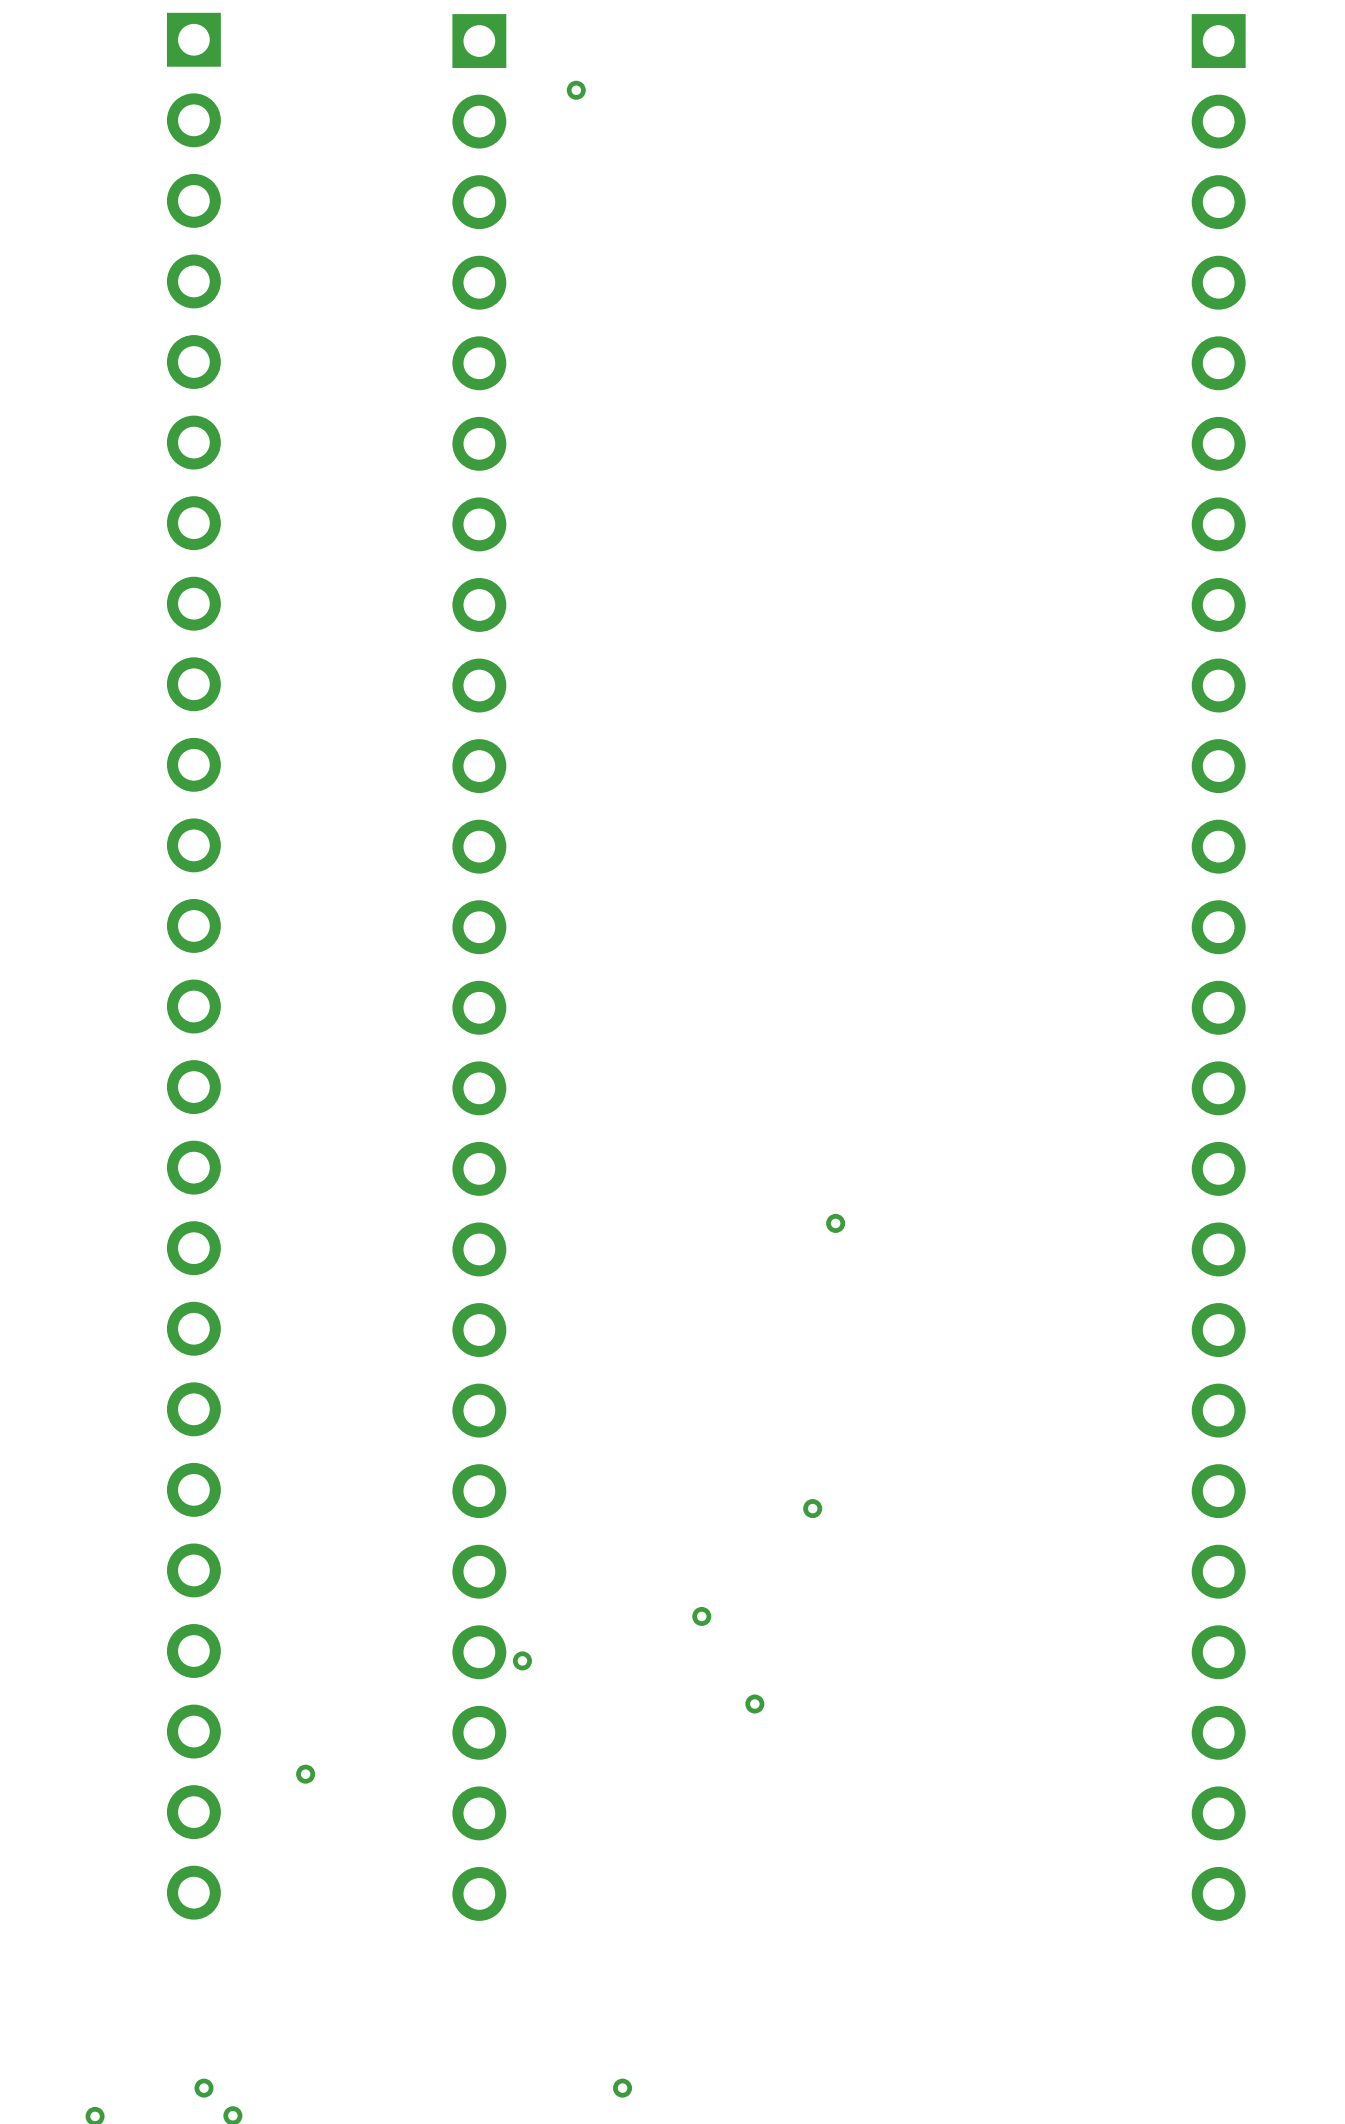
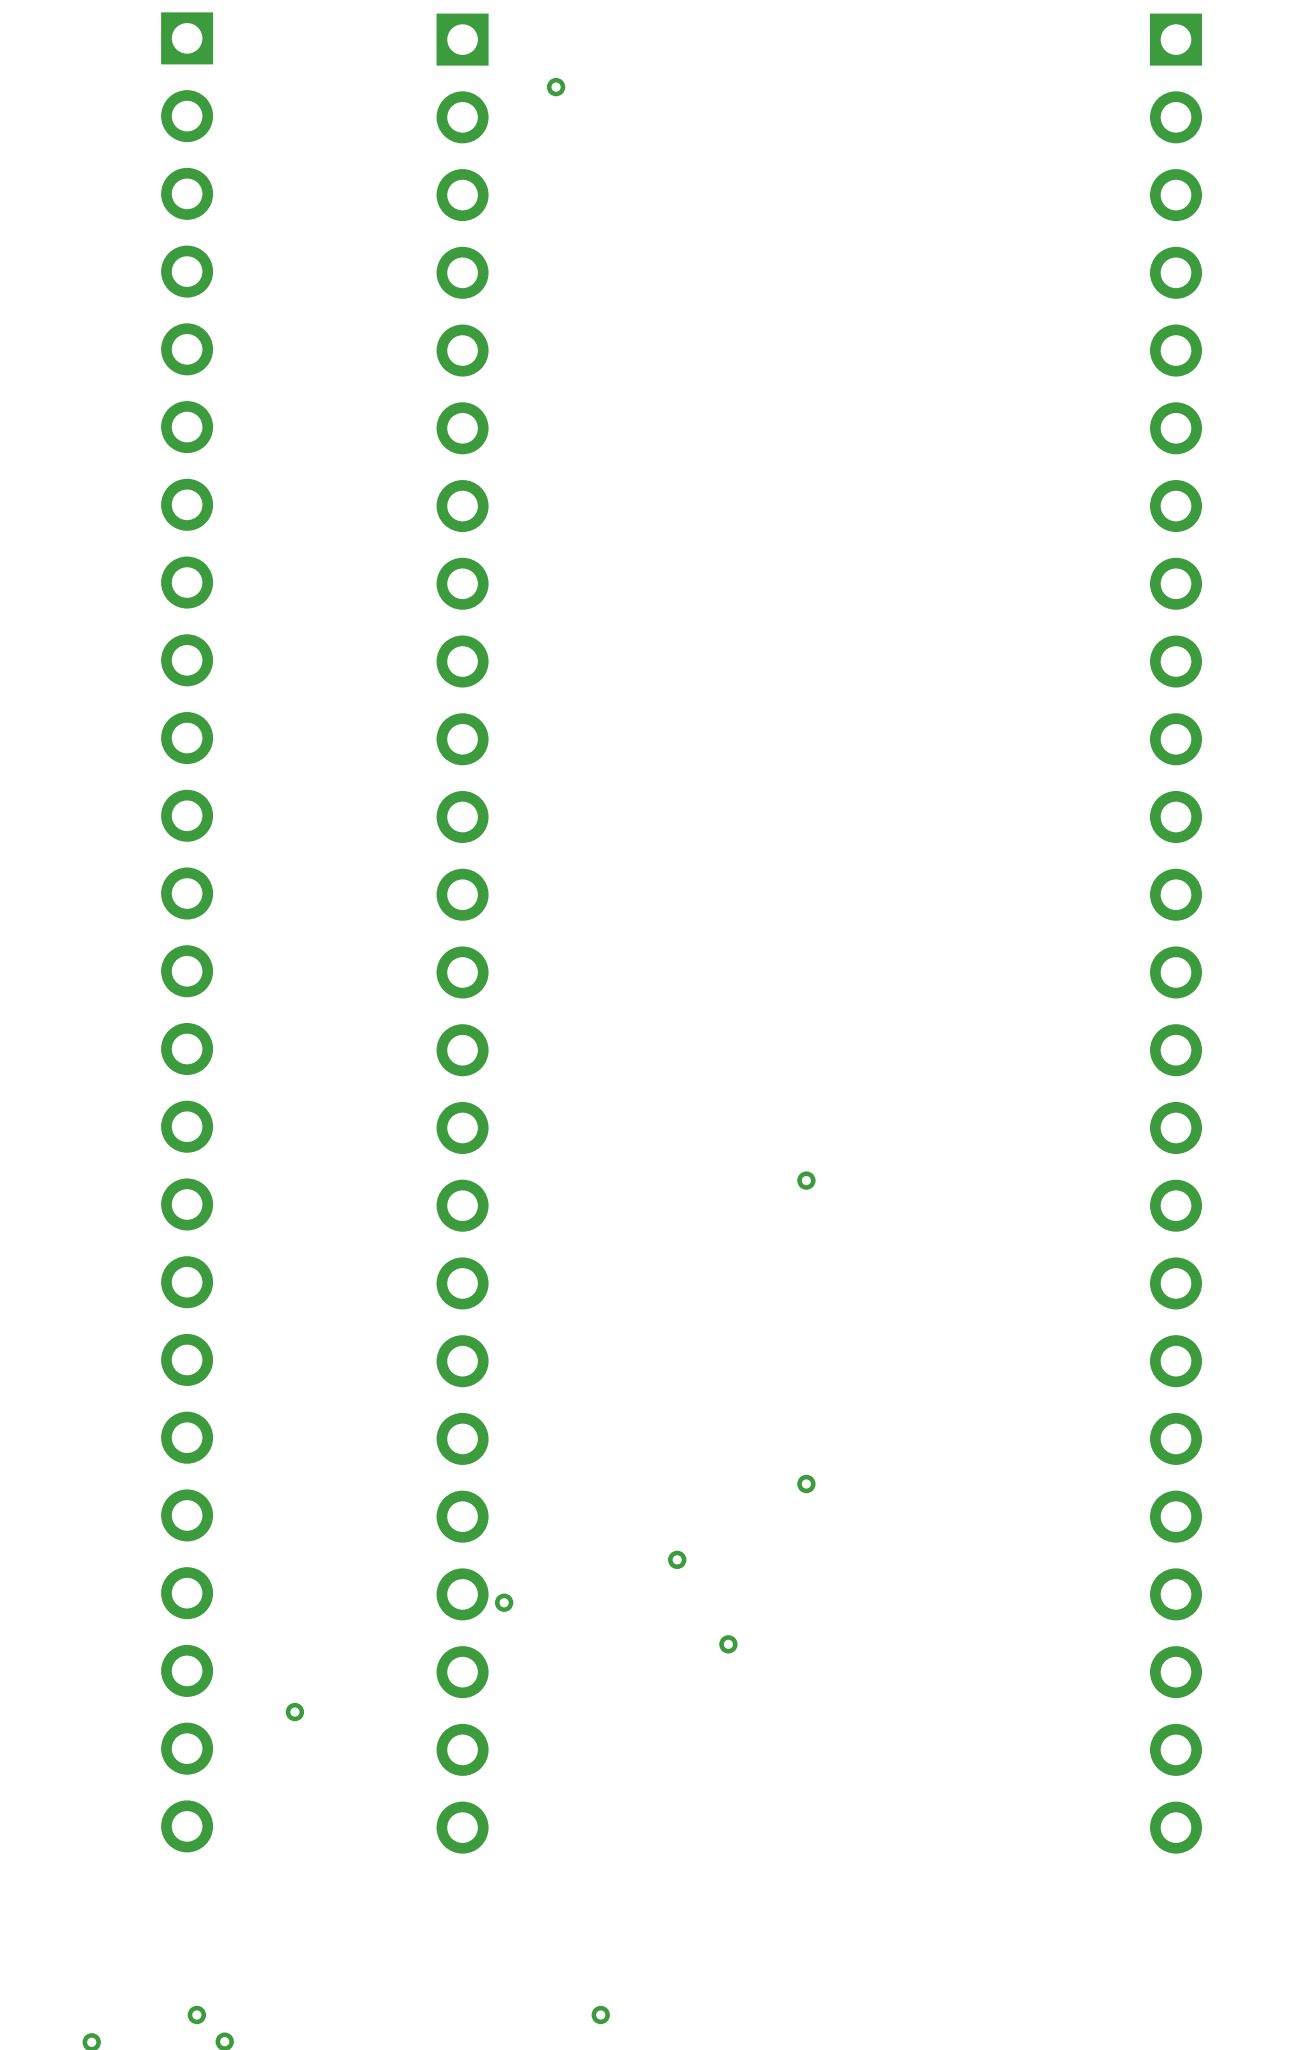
via position: (812, 1508) -> (806, 1484)

